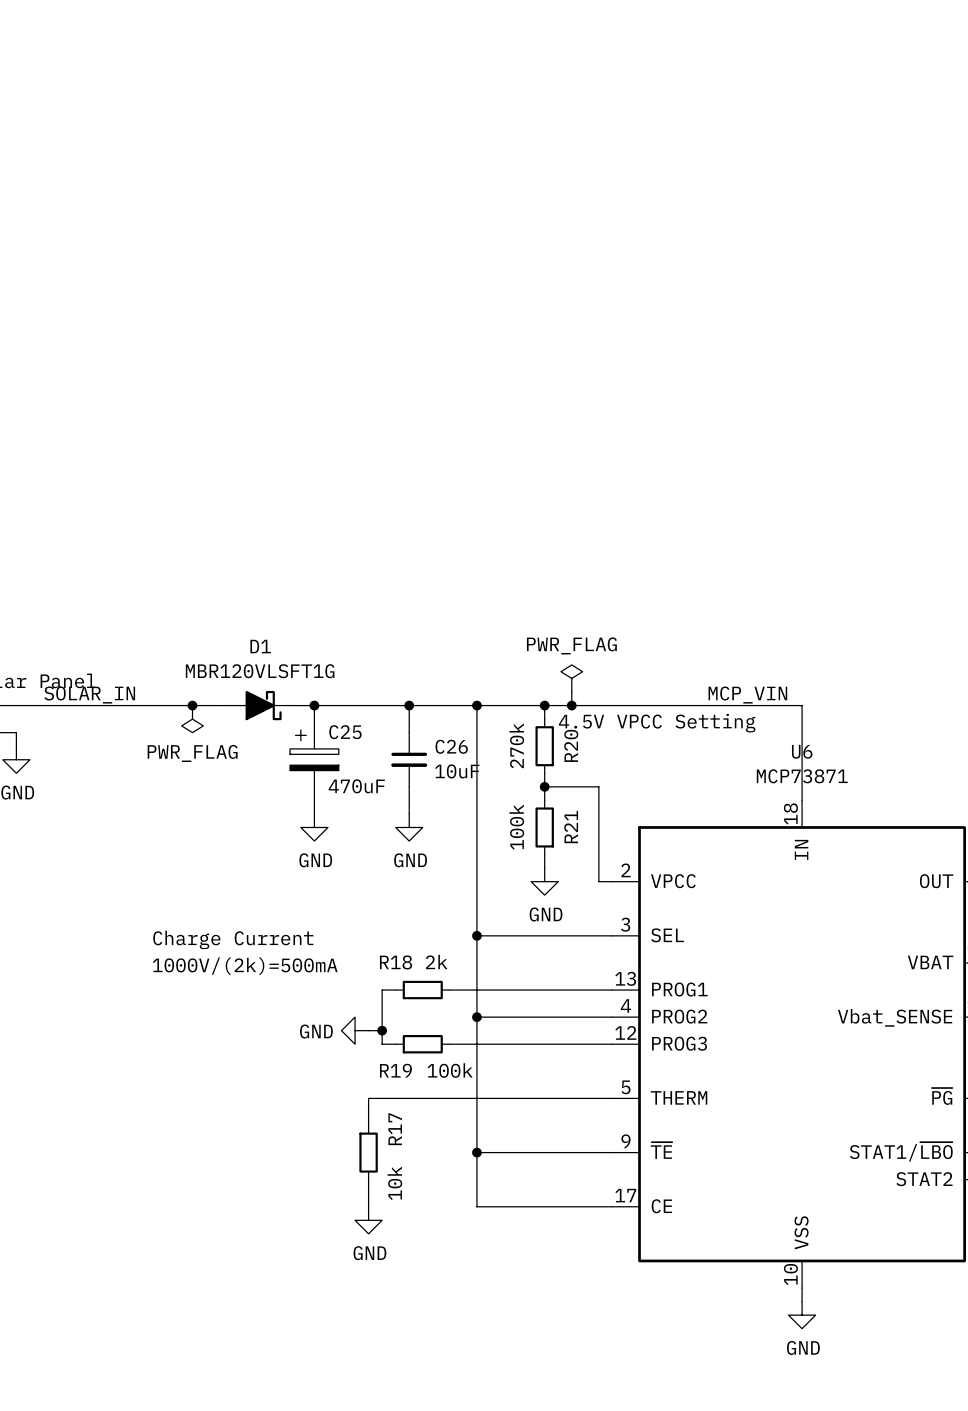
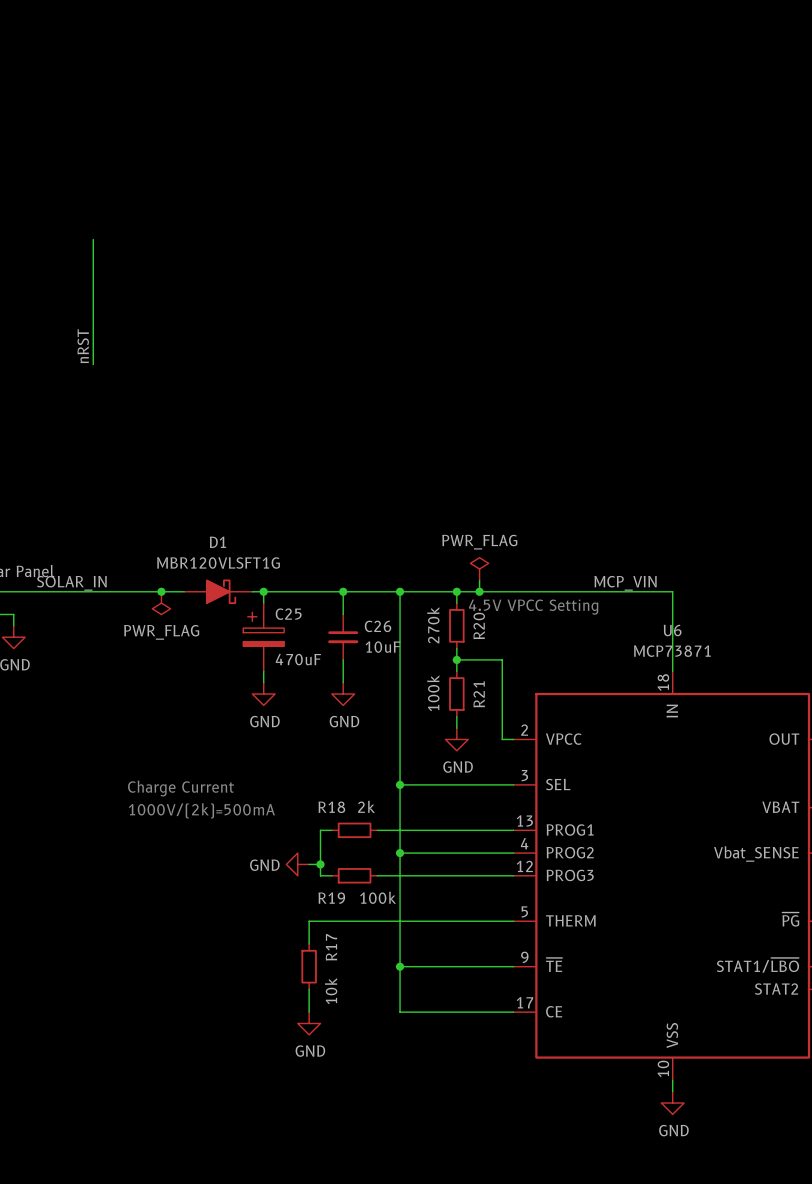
wire: none -> (93, 239) (93, 364)
label: none -> nRST (83, 346)

